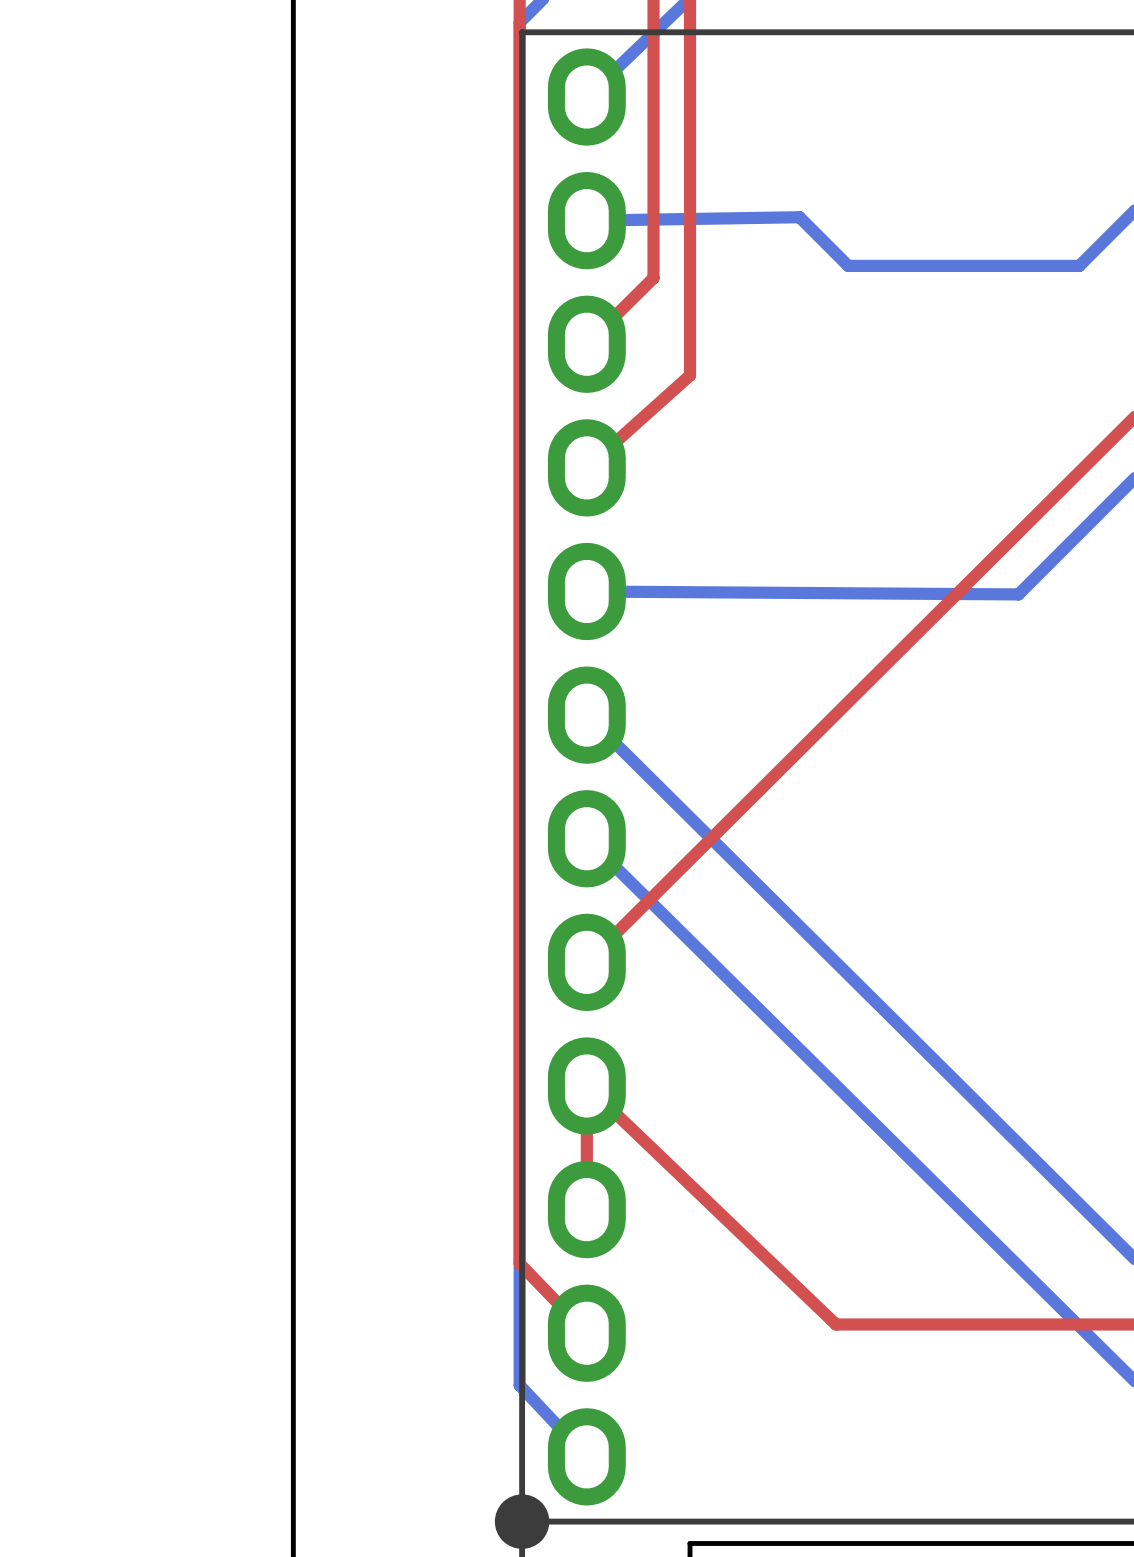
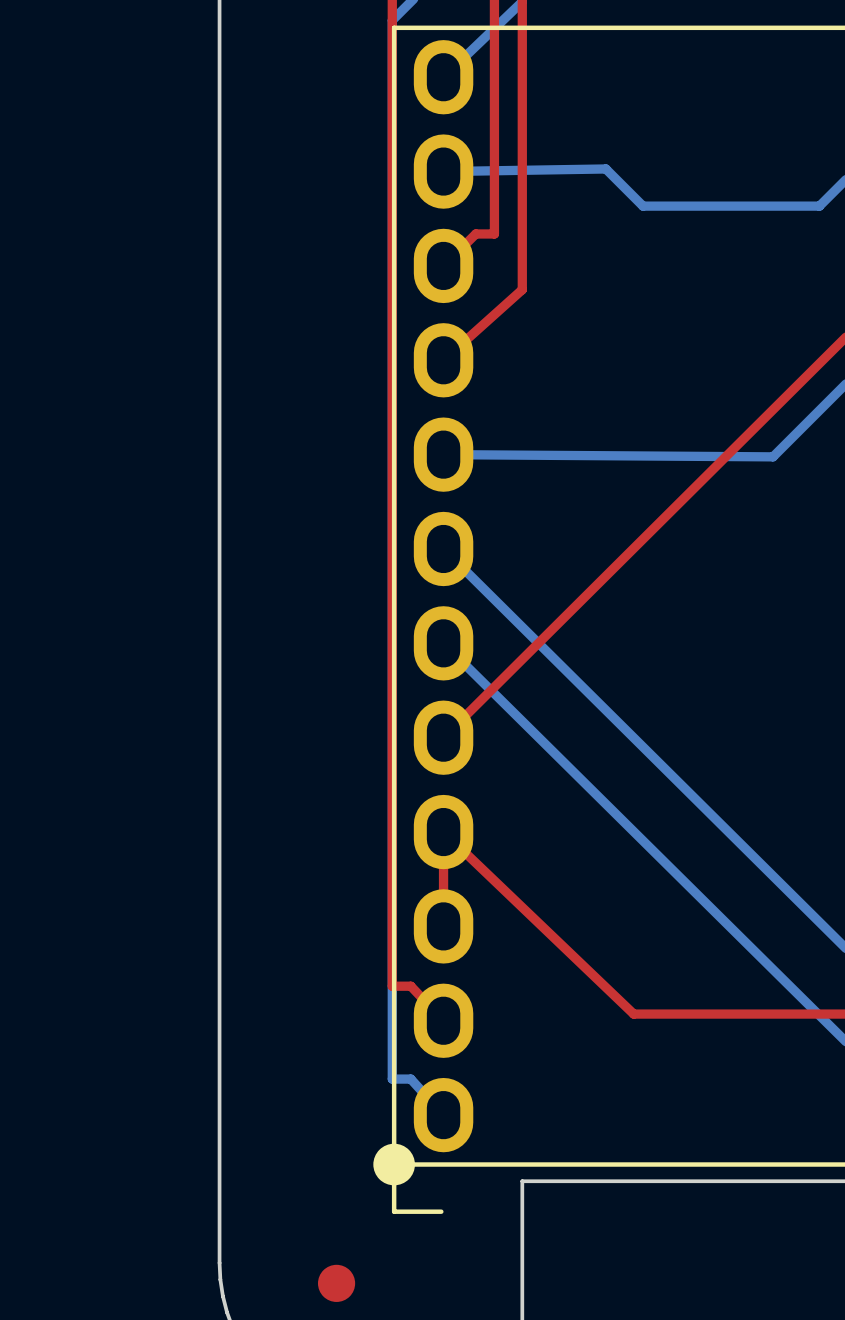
top track: (653, 278) (586, 344) -> (494, 215) (494, 233) (475, 233) (443, 265)
top track: (519, 1263) (586, 1333) -> (392, 967) (392, 986) (410, 986) (443, 1020)
bottom track: (519, 1385) (586, 1456) -> (392, 1060) (392, 1079) (410, 1079) (443, 1115)

